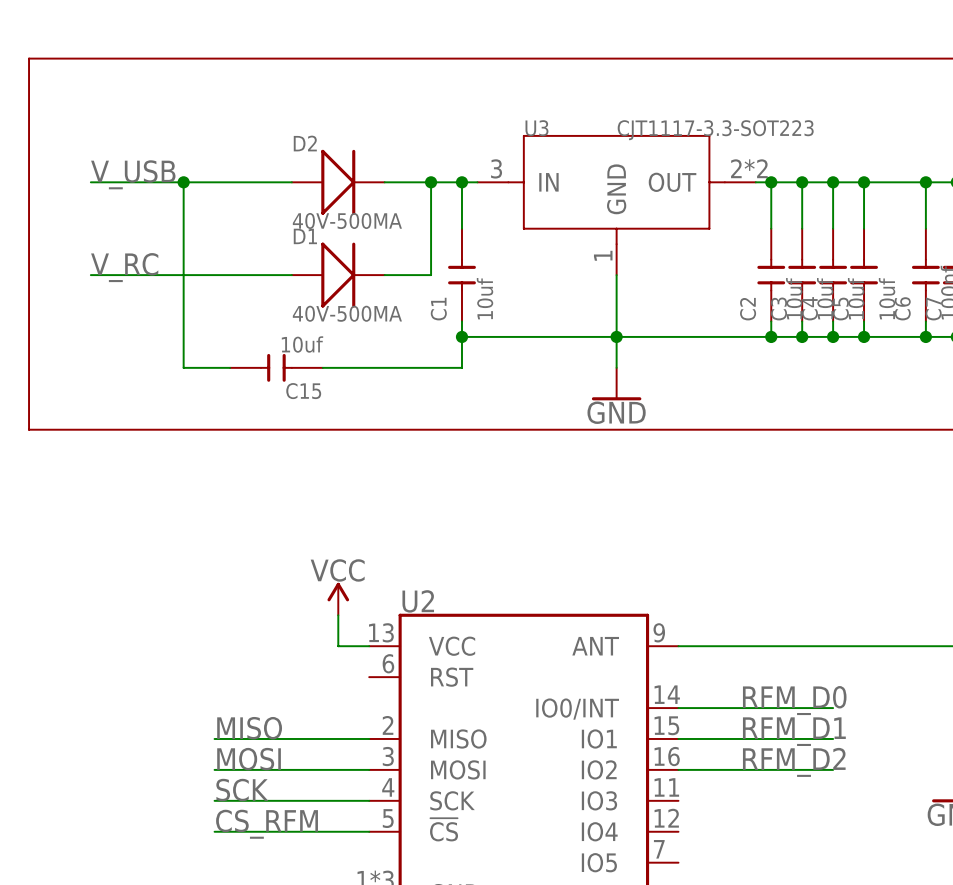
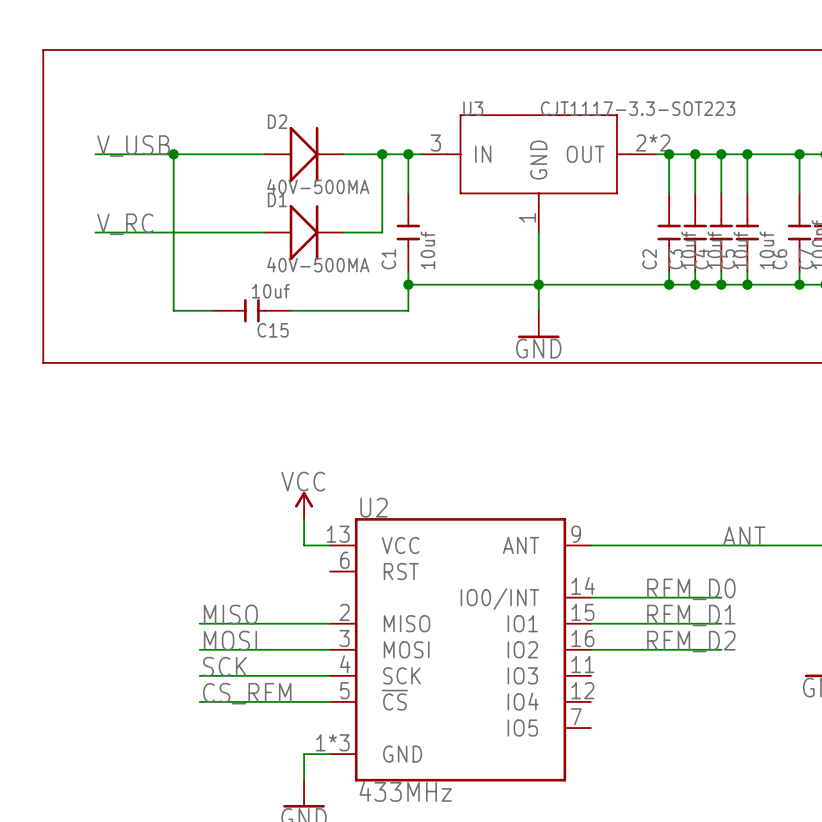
label: none -> ANT (744, 536)

